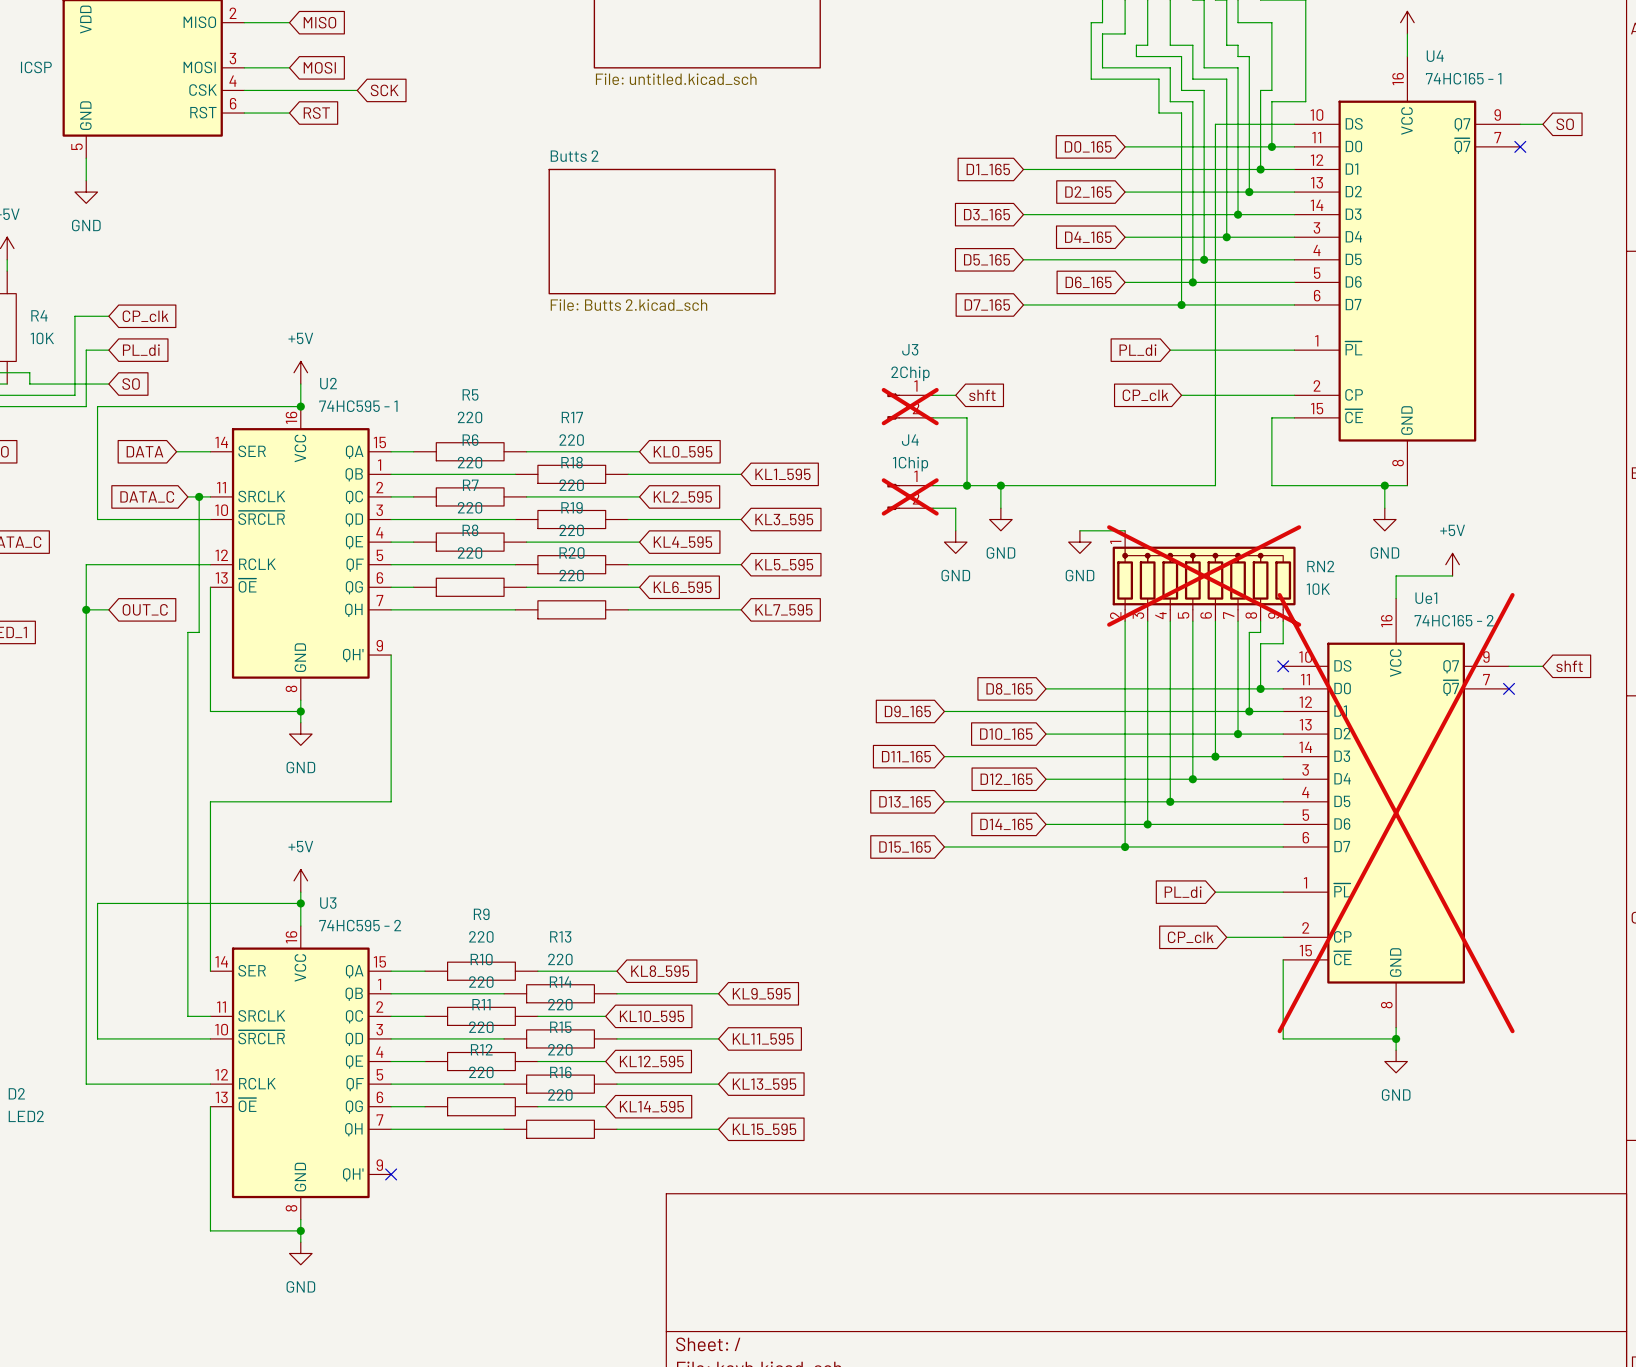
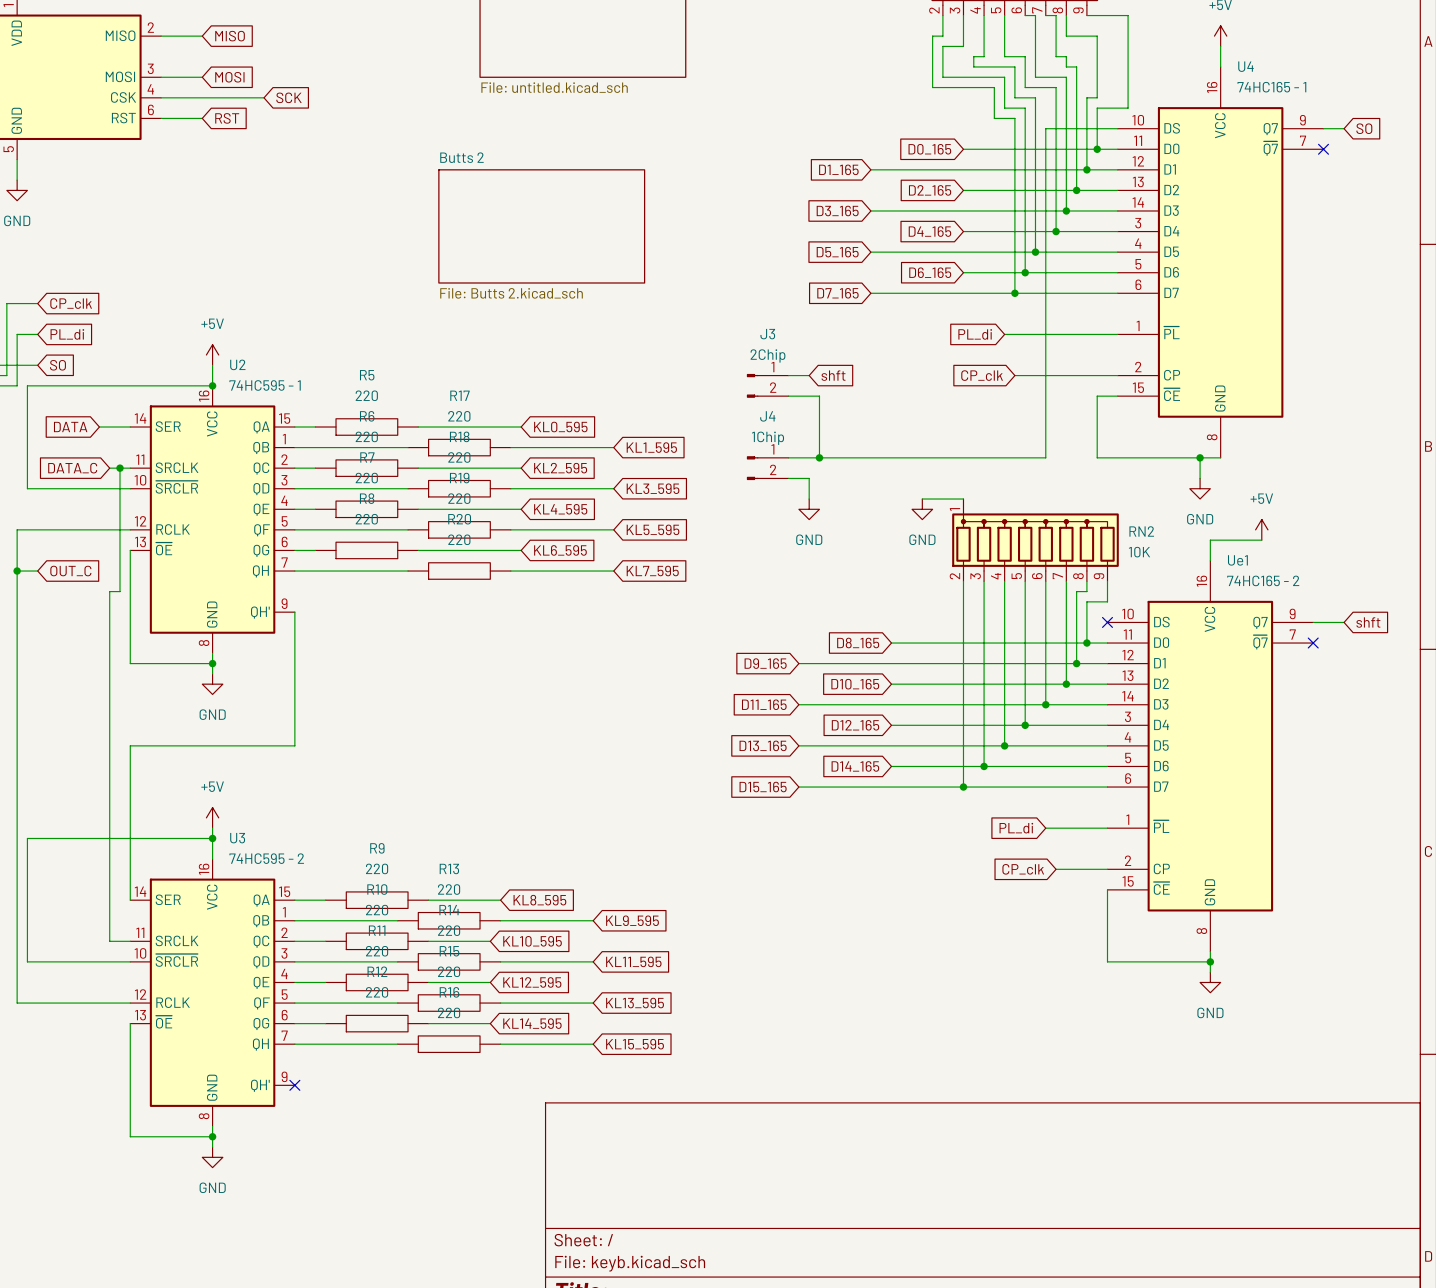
J3 do-not-place cross: (910, 406) -> none
wire: (1000, 485) (1000, 508) -> none
junction: (1000, 485) -> none
J4 do-not-place cross: (910, 496) -> none
power symbol: GND (1000, 519) -> none
RN2 do-not-place cross: (1204, 575) -> none
Ue1 do-not-place cross: (1396, 813) -> none

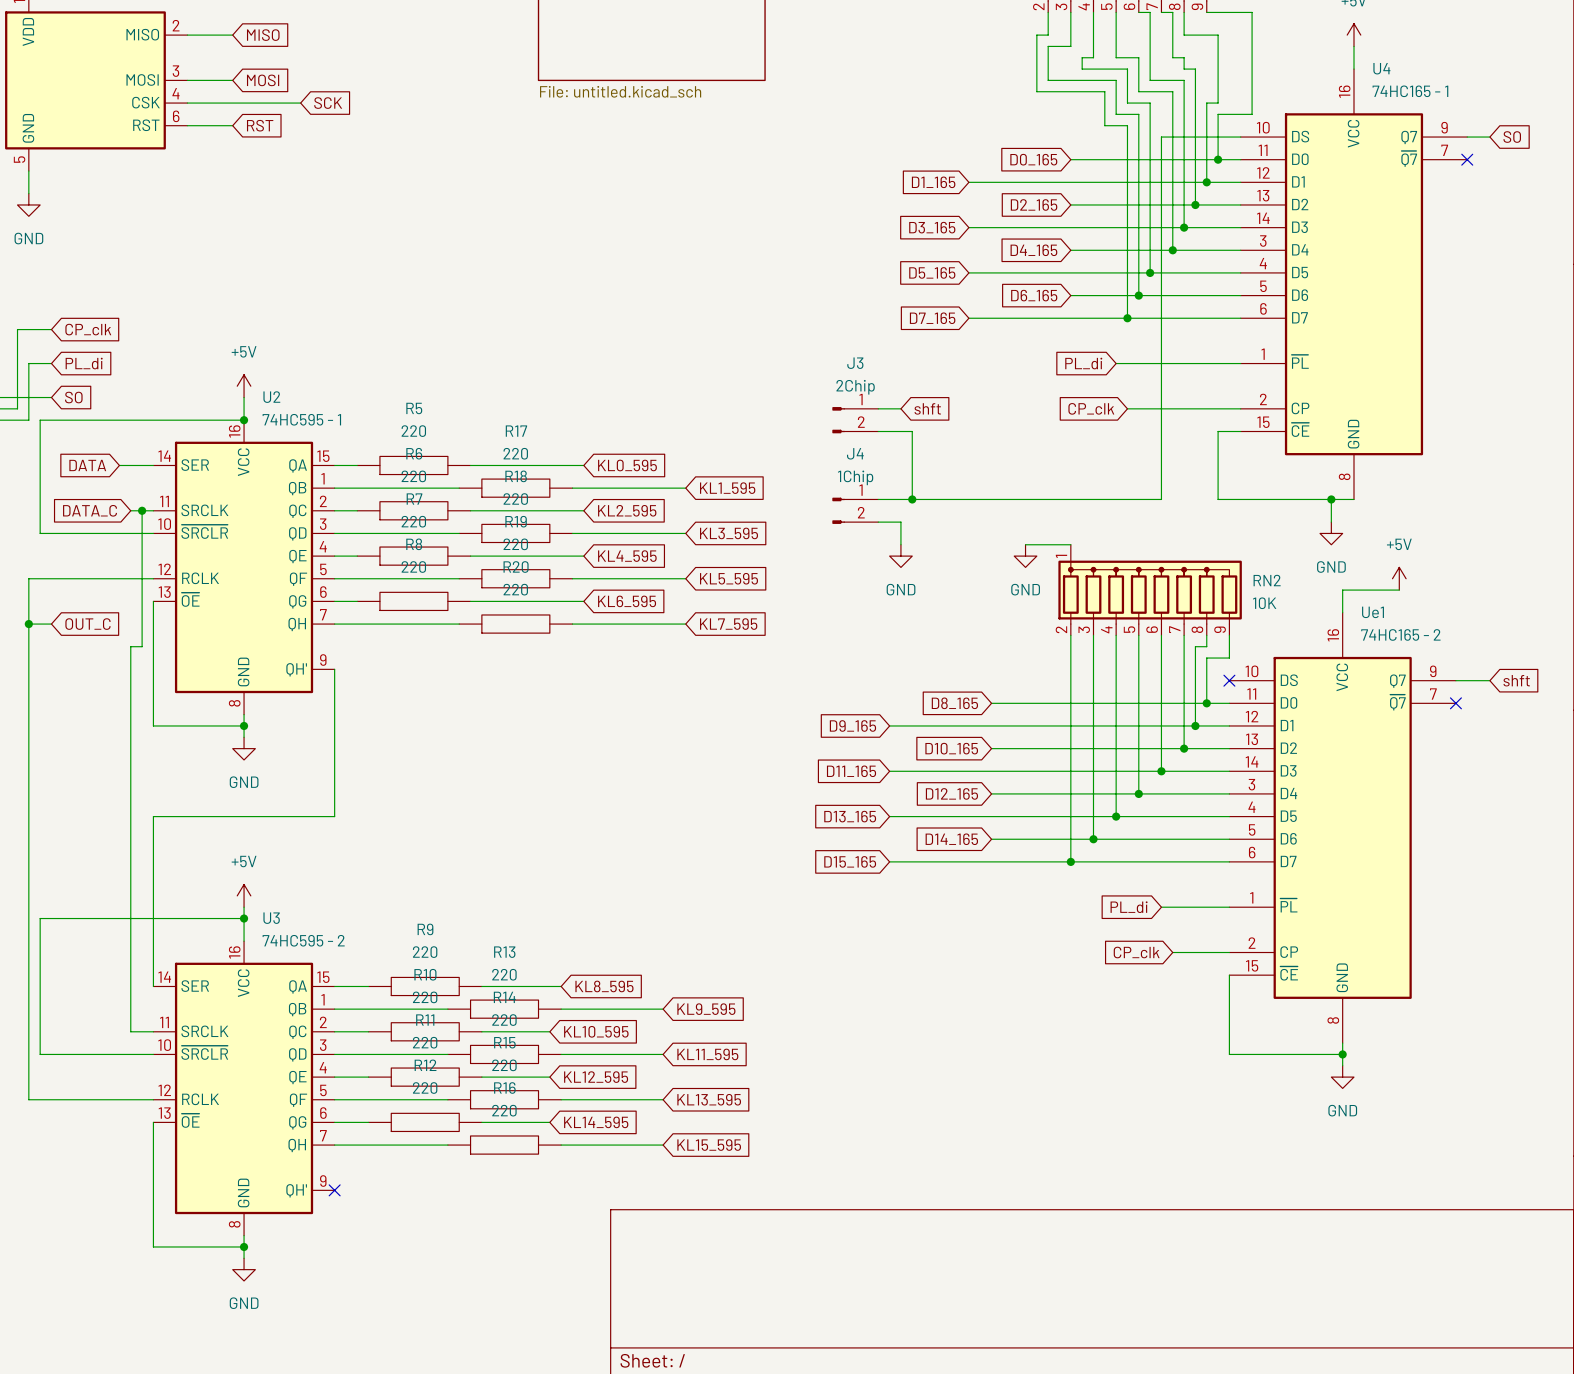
sheet Butts 2: File: Butts 2.kicad_sch (541, 226) -> none

